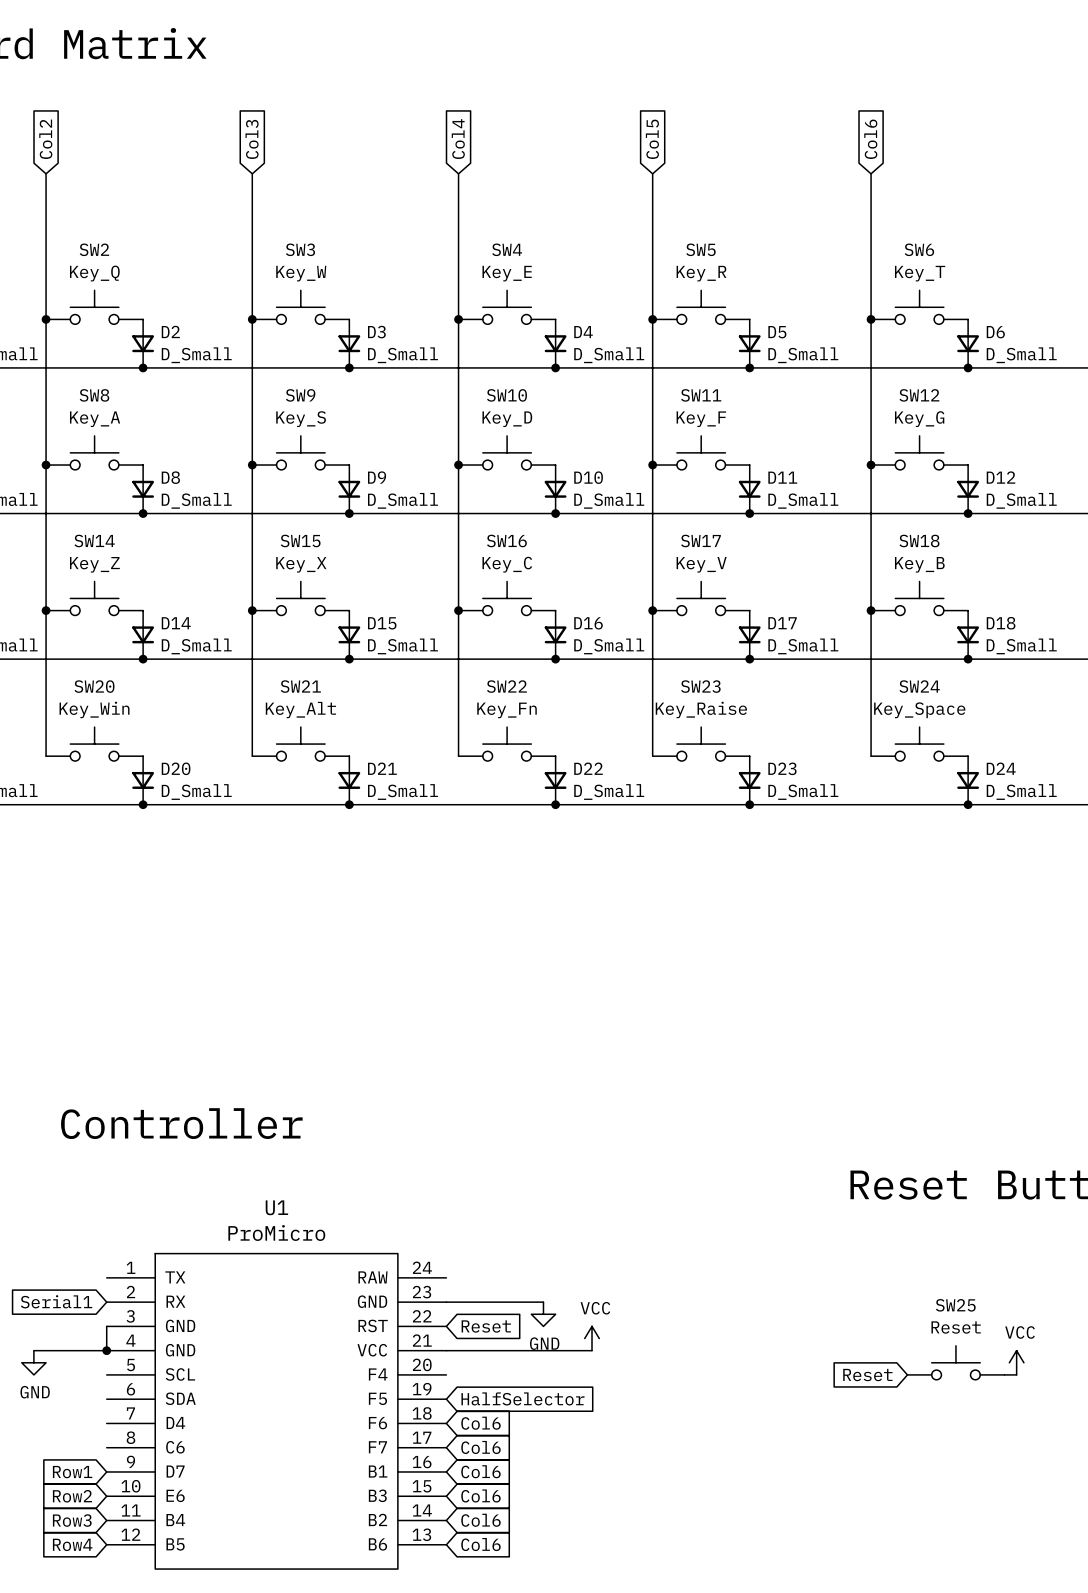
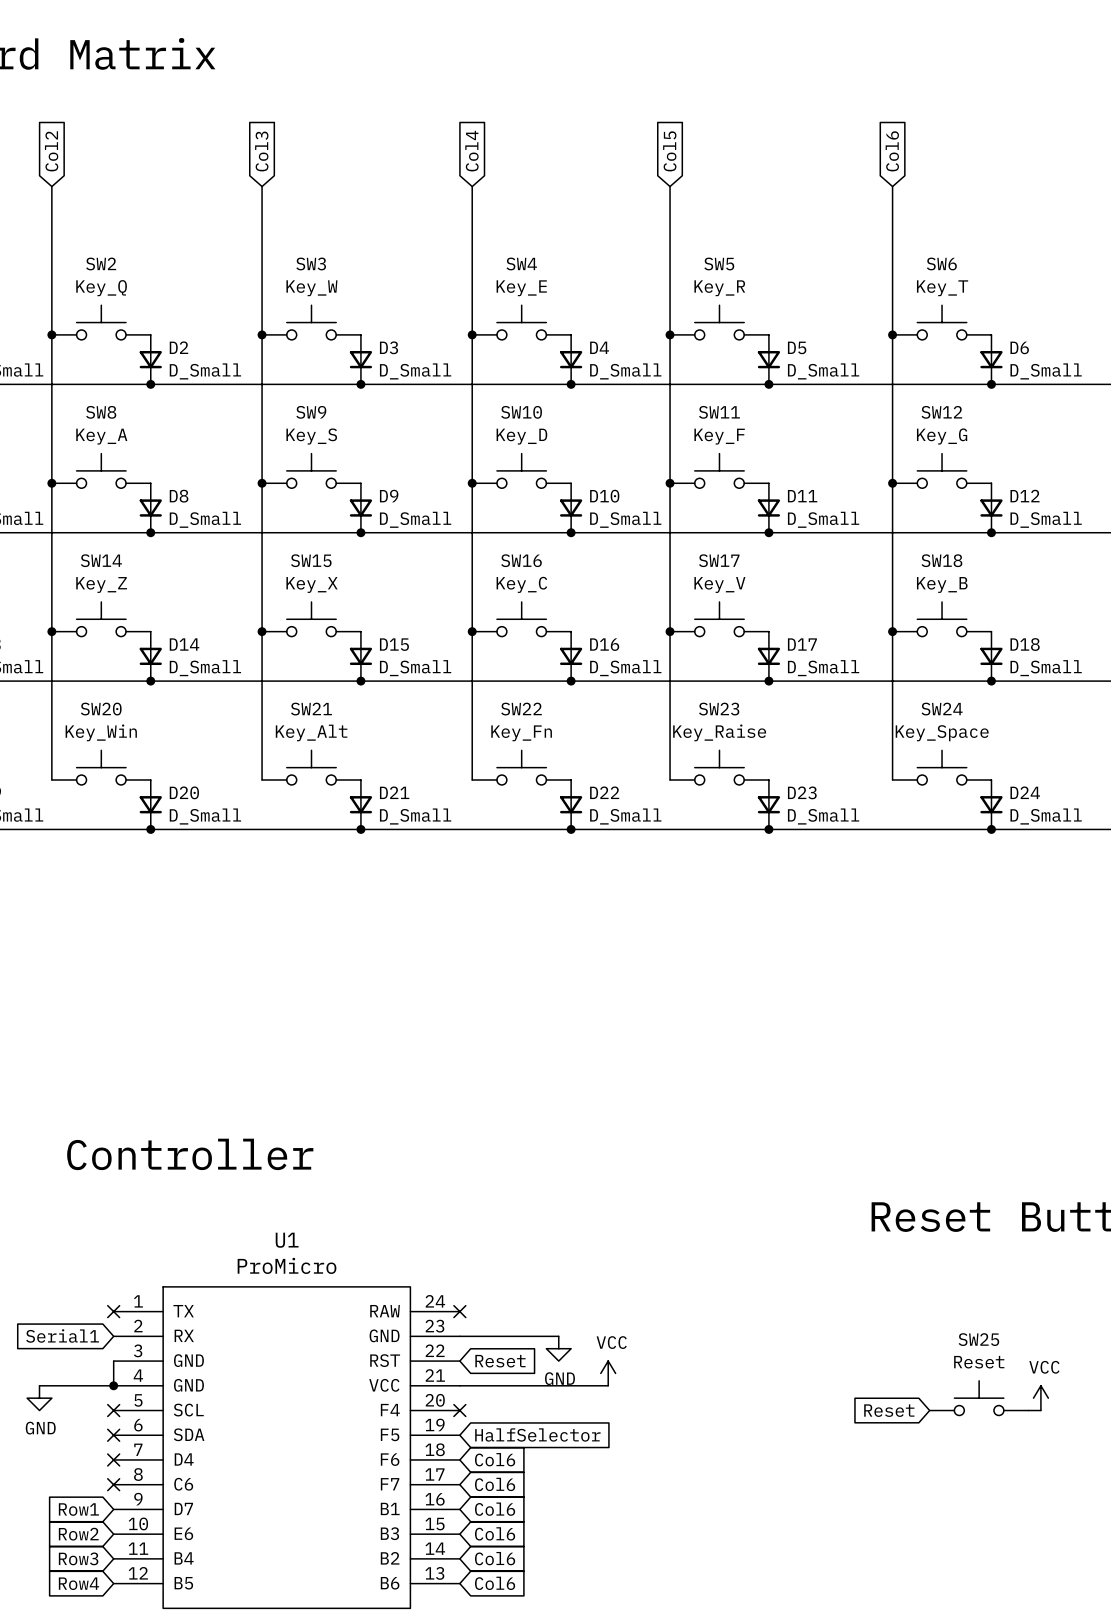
no-connect mark: none -> (113, 1311)
no-connect mark: none -> (459, 1311)
no-connect mark: none -> (113, 1410)
no-connect mark: none -> (459, 1410)
no-connect mark: none -> (113, 1435)
no-connect mark: none -> (113, 1459)
no-connect mark: none -> (113, 1484)

